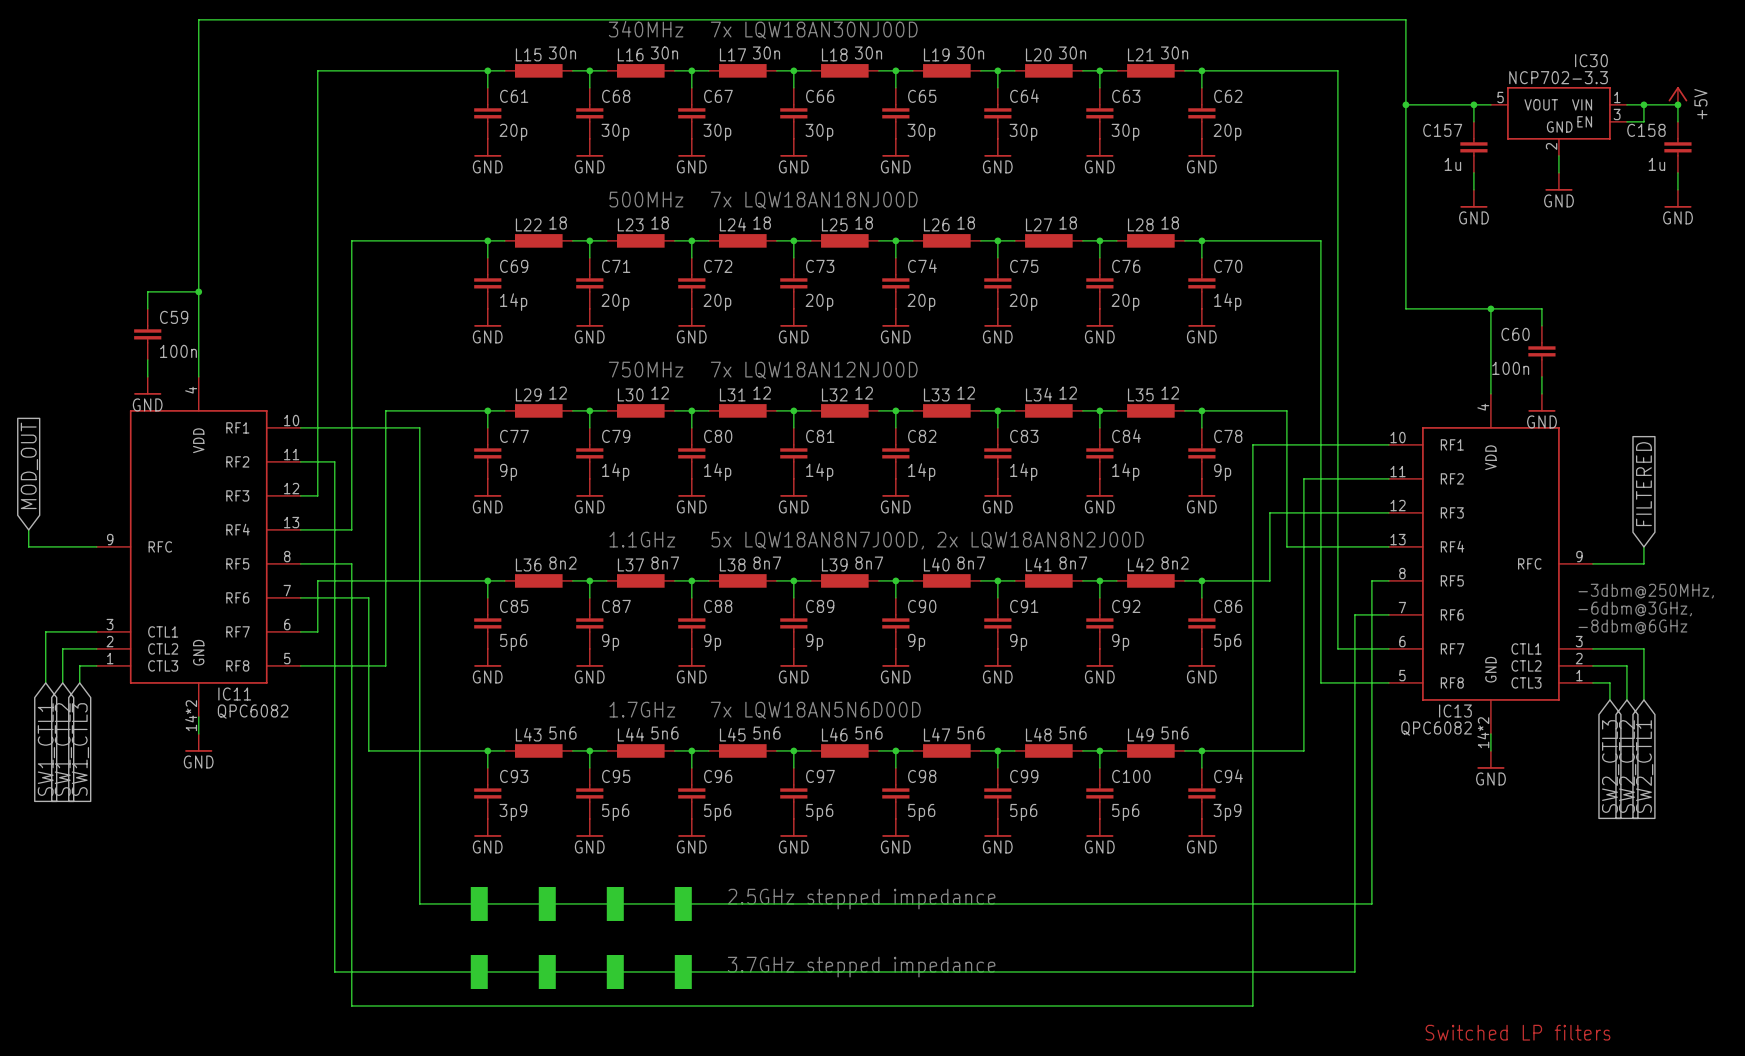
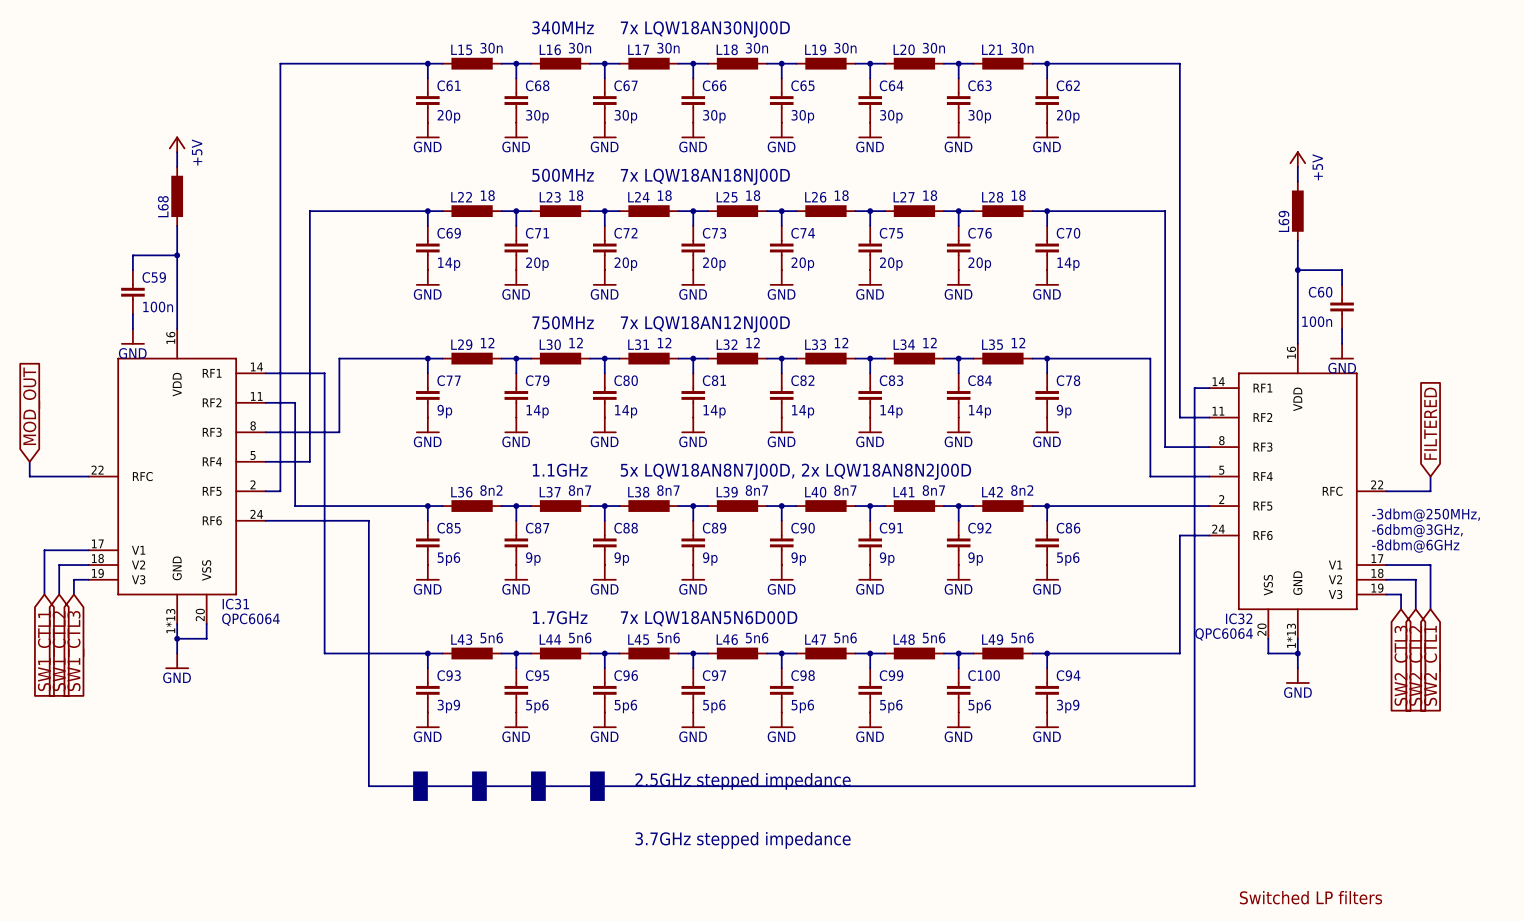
wire: (1337, 70) (1337, 240) -> (1165, 63) (1179, 63) (1179, 417)
power symbol: +5V (1677, 95) -> none
wire: (1405, 104) (1490, 104) -> none
junction: (1405, 104) -> none
wire: (1473, 104) (1473, 121) -> none
junction: (1473, 104) -> none
wire: (1626, 104) (1677, 104) (1677, 121) -> none
wire: (1643, 104) (1643, 121) (1626, 121) -> none
junction: (1643, 104) -> none
junction: (1677, 104) -> none
IC30: NCP702-3.3 (1558, 121) -> none
C157: 1u (1473, 147) -> none
C158: 1u (1677, 147) -> none
wire: (1558, 155) (1558, 172) -> none
power symbol: none -> +5V (177, 144)
wire: (198, 172) (198, 19) (1405, 19) (1405, 308) (1490, 308) -> (1297, 240) (1297, 270)
wire: (1473, 172) (1473, 189) -> (1297, 166) (1297, 181)
wire: (1677, 172) (1677, 189) -> none
power symbol: none -> +5V (1297, 159)
power symbol: GND (1558, 181) -> none
power symbol: GND (1473, 198) -> none
power symbol: GND (1677, 198) -> none
L68: none -> (177, 196)
wire: (1320, 240) (1320, 410) -> (1150, 211) (1165, 211)
L69: none -> (1297, 211)
wire: (1286, 410) (1286, 546) (1320, 546) (1320, 682) (1388, 682) -> (1120, 358) (1150, 358)
wire: (368, 427) (419, 427) (419, 597) -> (324, 373) (324, 520) (368, 520)
wire: (1371, 444) (1252, 444) (1252, 1005) (351, 1005) (351, 563) (317, 563) -> none
wire: (1354, 478) (1303, 478) (1303, 750) -> (1179, 653) (1135, 653)
wire: (385, 495) (385, 665) (300, 665) -> (339, 432) (280, 432) (280, 491)
IC11: QPC6082 (198, 546) -> none
IC31: none -> QPC6064 (177, 476)
IC13: QPC6082 (1490, 563) -> none
IC32: none -> QPC6064 (1297, 491)
wire: (1269, 580) (1269, 512) (1337, 512) (1337, 648) (1388, 648) -> (1106, 506) (1194, 506) (1194, 388)
wire: (300, 631) (317, 631) (317, 580) (334, 580) (334, 971) (1354, 971) (1354, 750) -> none
wire: none -> (206, 624) (206, 638) (177, 638) (177, 653)
junction: none -> (177, 638)
wire: none -> (1268, 638) (1268, 653) (1297, 653) (1297, 668)
power symbol position: GND (198, 742) -> GND (177, 661)
junction: none -> (1297, 653)
power symbol position: GND (1490, 759) -> GND (1297, 675)
drawing: [470, 954, 488, 989] -> none
drawing: [538, 954, 556, 989] -> none
drawing: [606, 954, 624, 989] -> none
drawing: [674, 954, 692, 989] -> none

